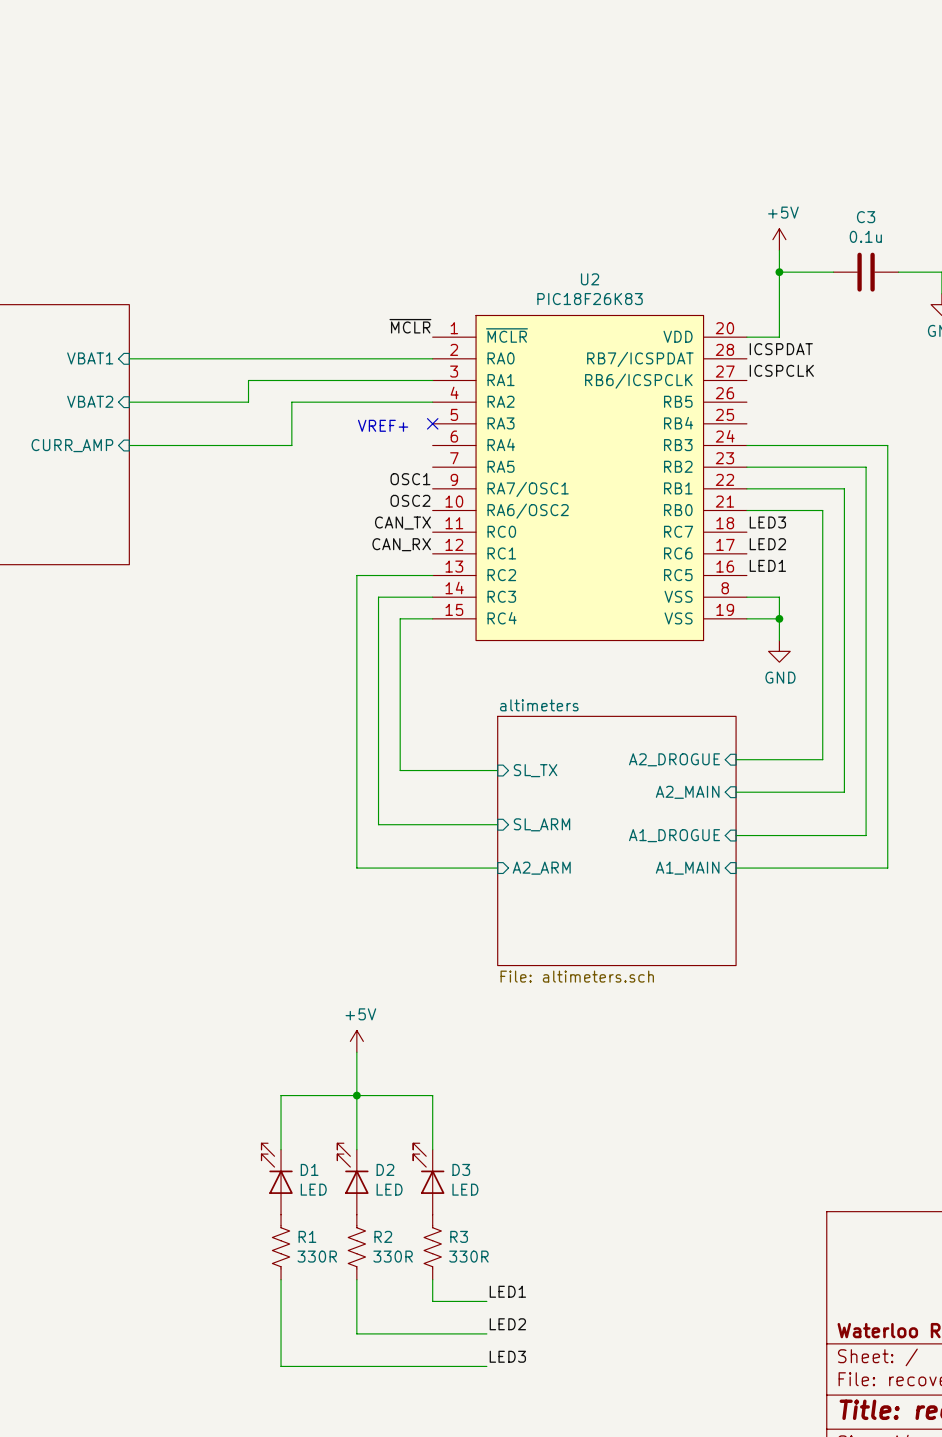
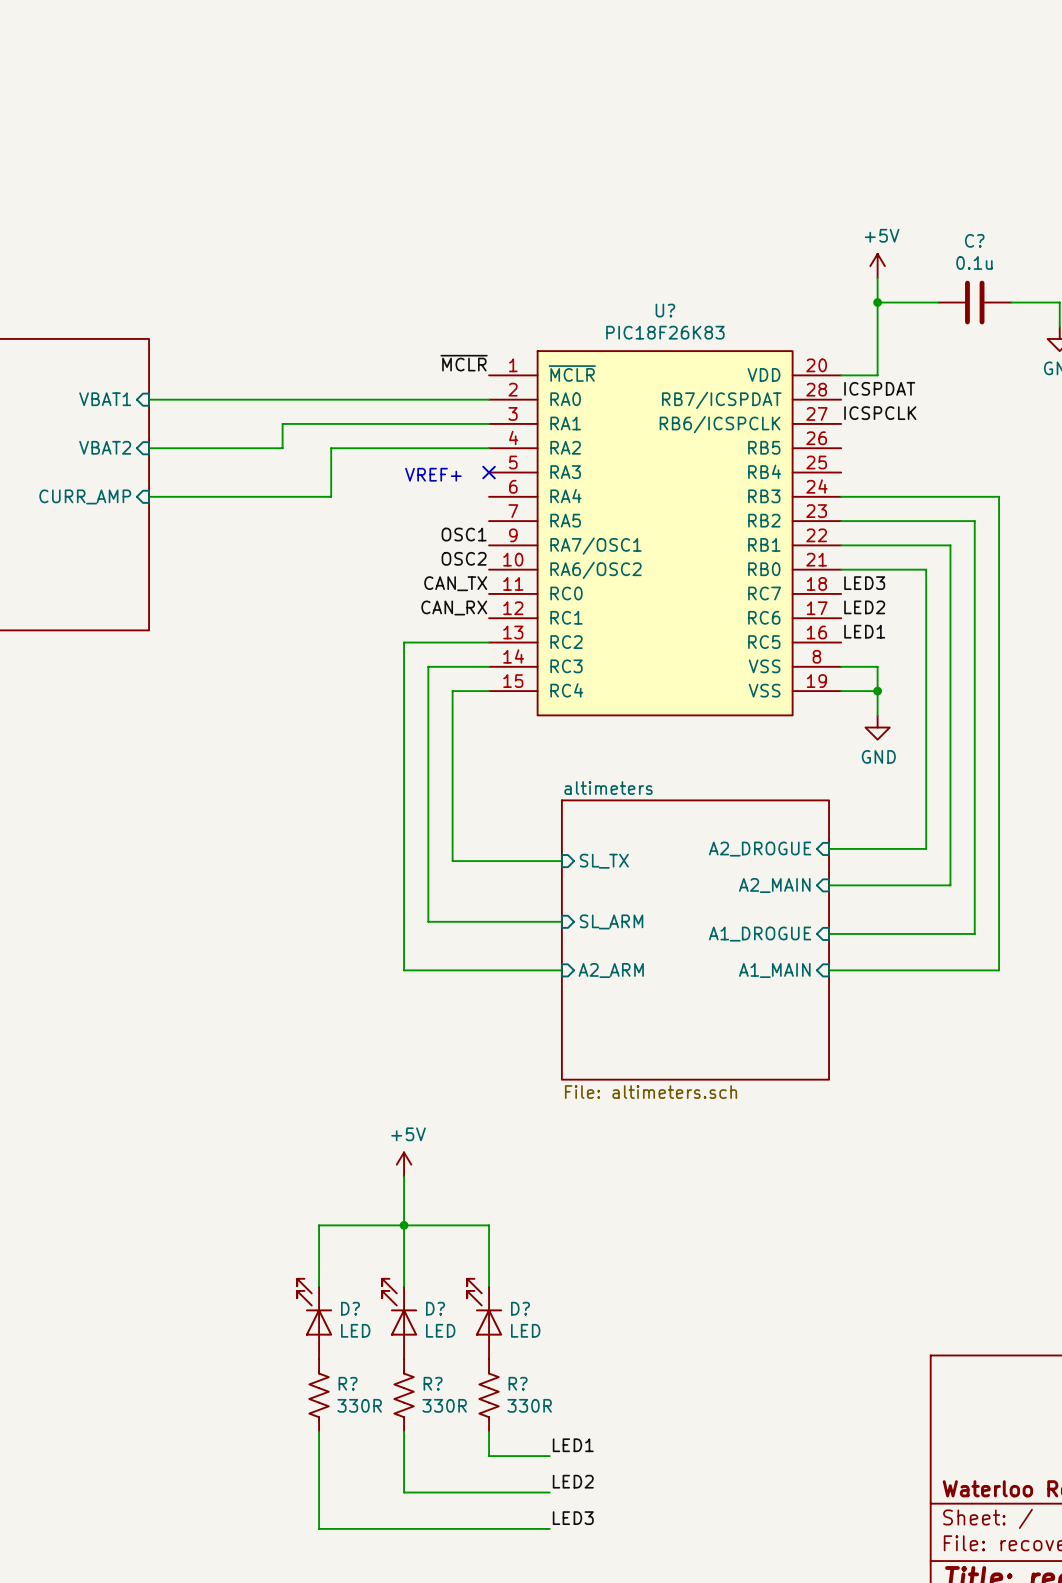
C3 name: C3 (866, 217) -> C? (974, 240)
U2 name: U2 (590, 279) -> U? (665, 310)
D1 name: D1 (309, 1169) -> D? (350, 1308)
D2 name: D2 (385, 1169) -> D? (435, 1308)
D3 name: D3 (461, 1169) -> D? (520, 1308)
R1 name: R1 (307, 1236) -> R? (348, 1383)
R2 name: R2 (383, 1236) -> R? (433, 1383)
R3 name: R3 (459, 1236) -> R? (518, 1383)

